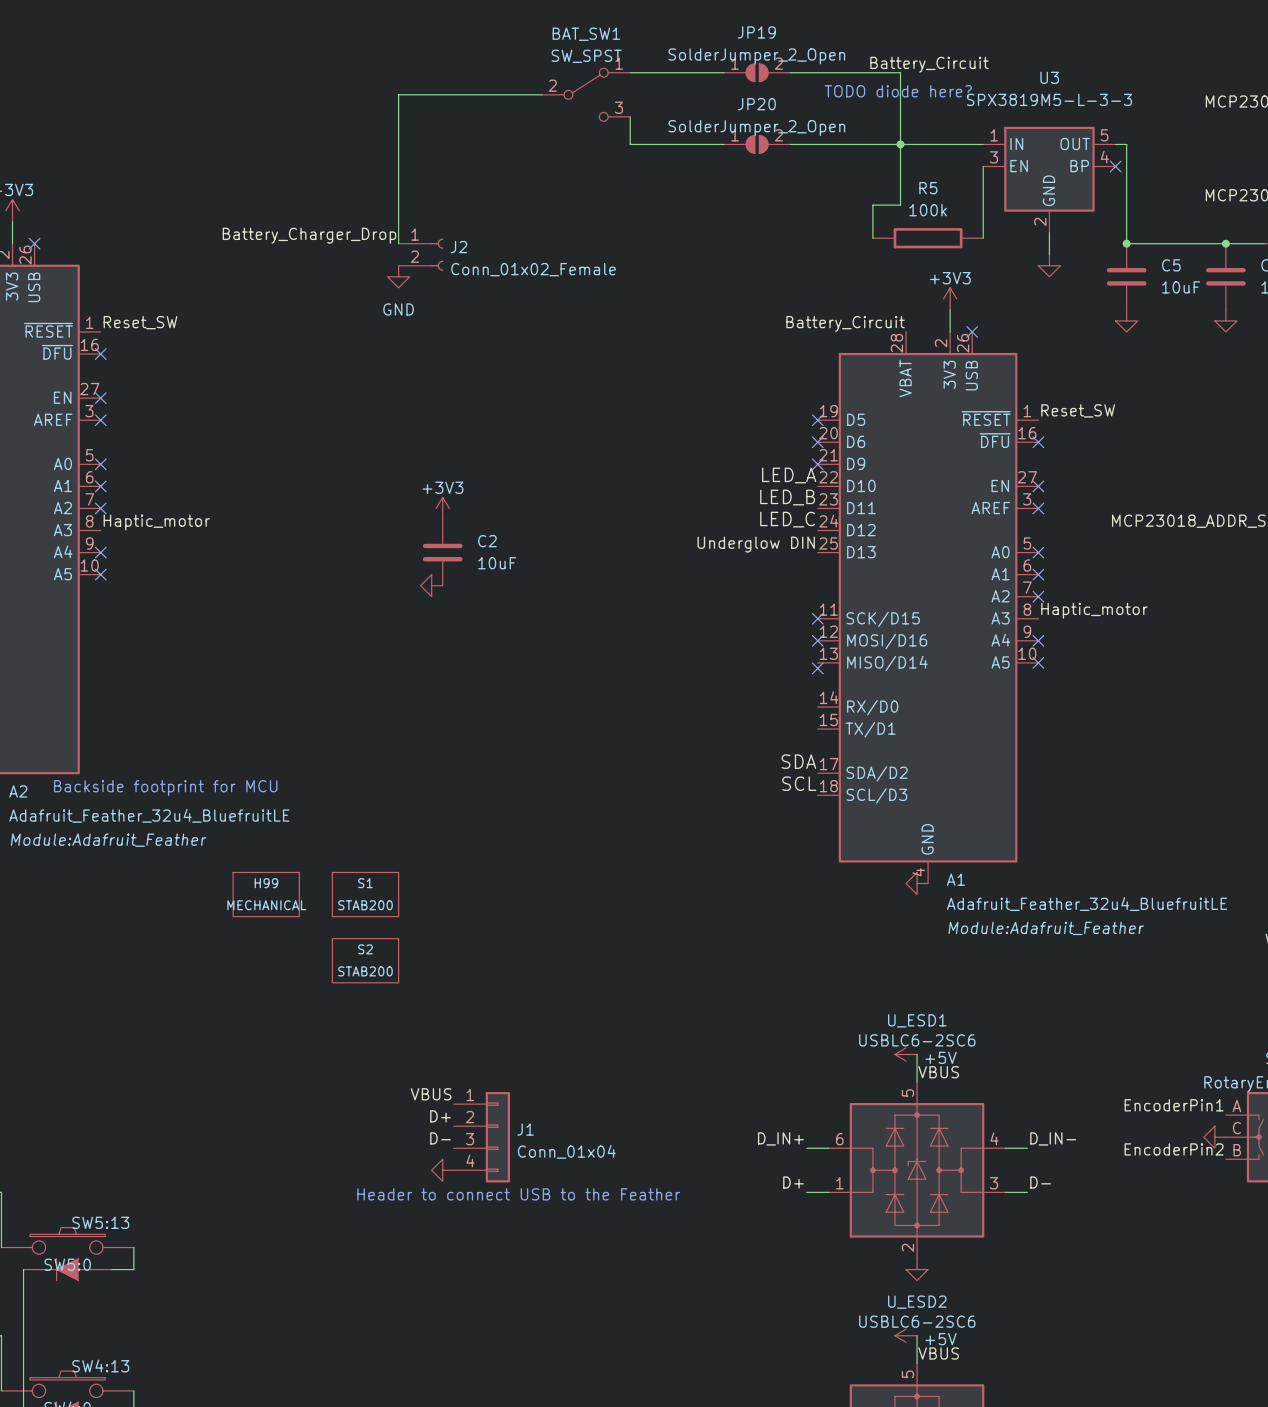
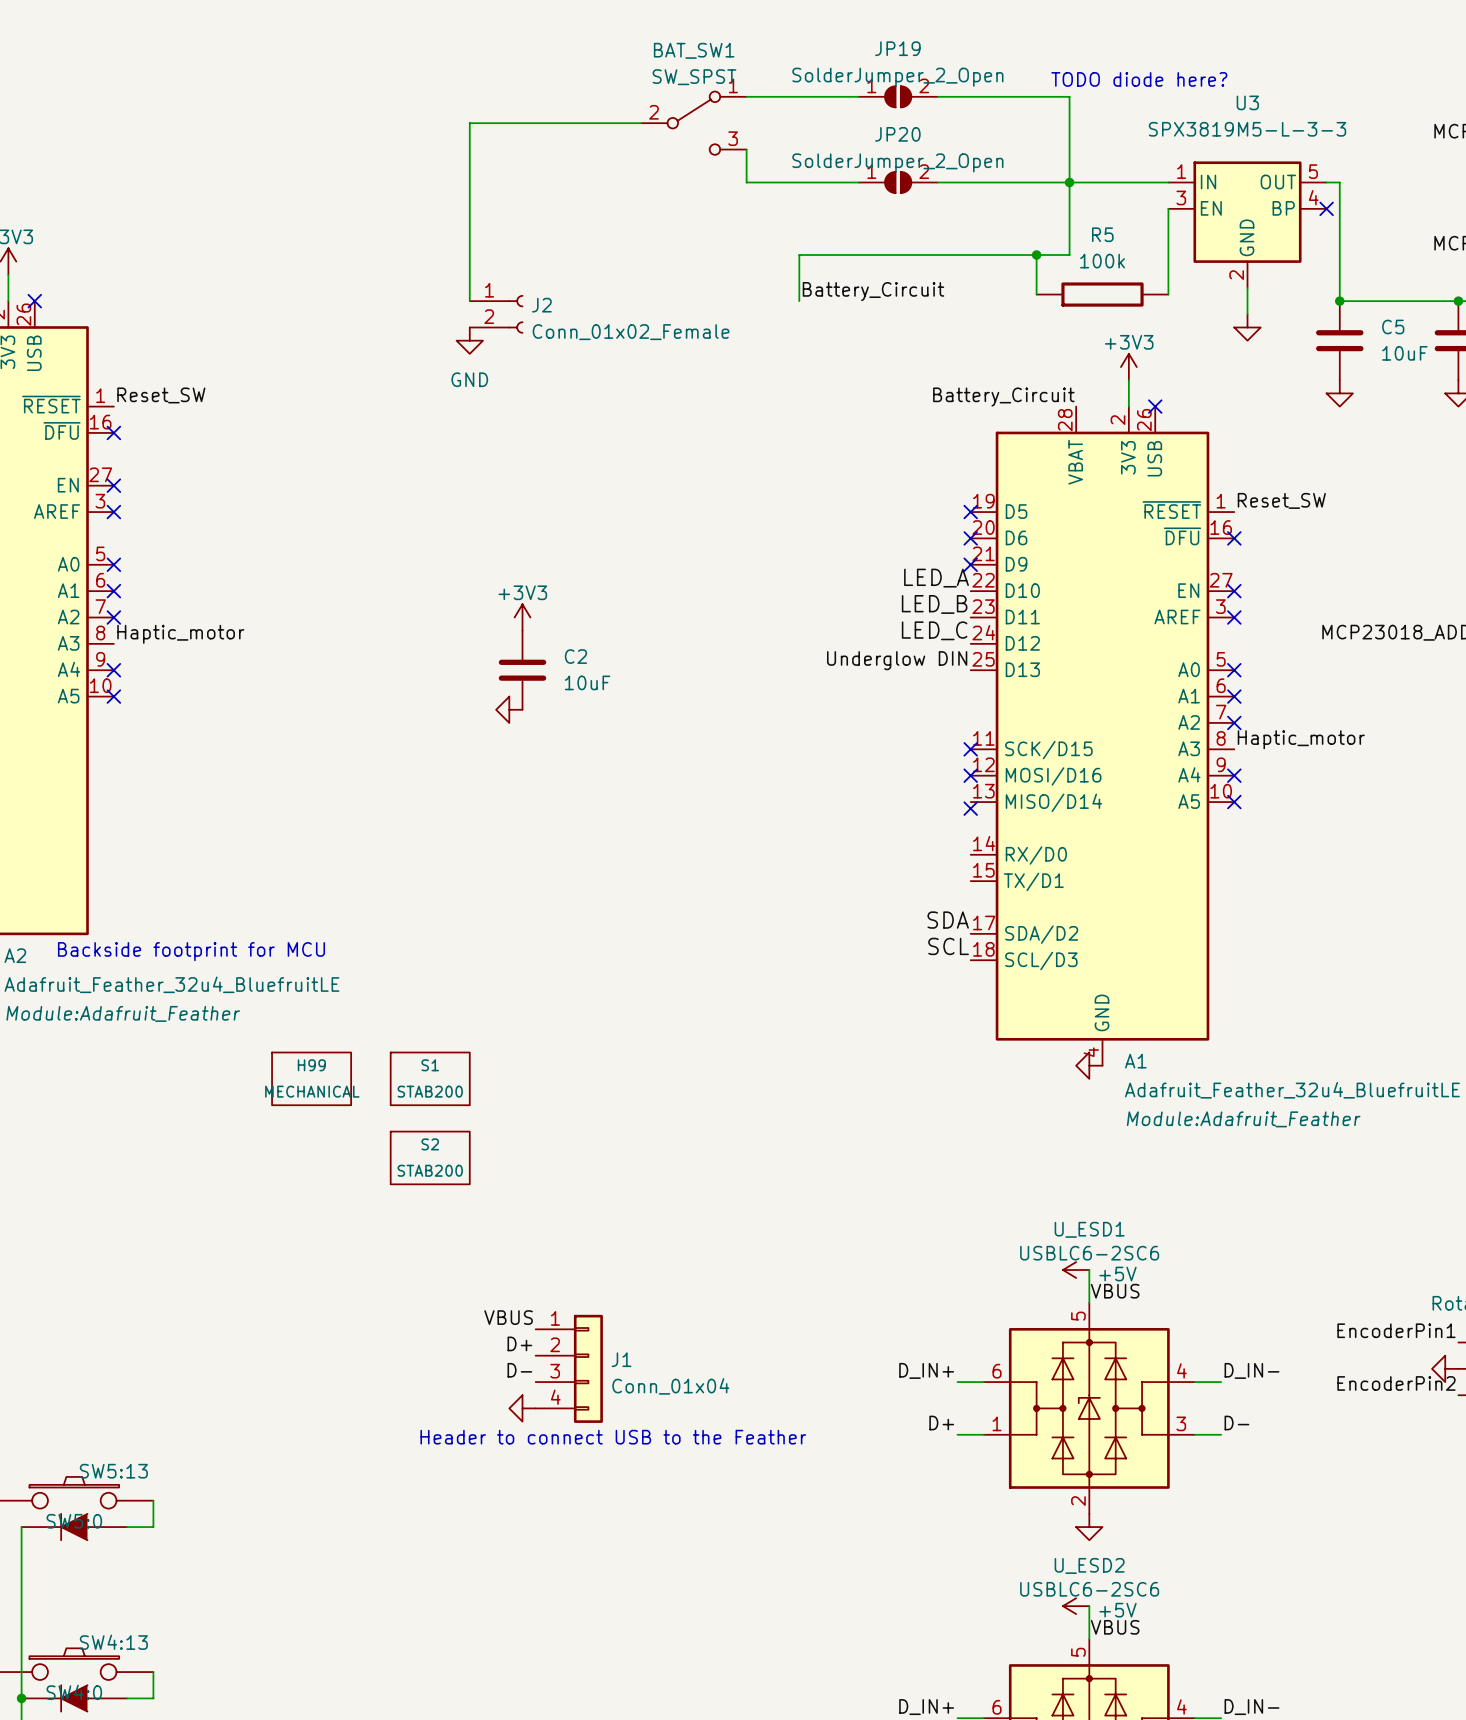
label: Battery_Circuit (929, 64) -> none
text position: TODO diode here? (898, 91) -> TODO diode here? (1139, 79)
wire: none -> (1036, 255) (799, 255) (799, 301)
junction: none -> (1036, 255)
label: Battery_Charger_Drop (309, 235) -> none
label: none -> Battery_Circuit (873, 291)

